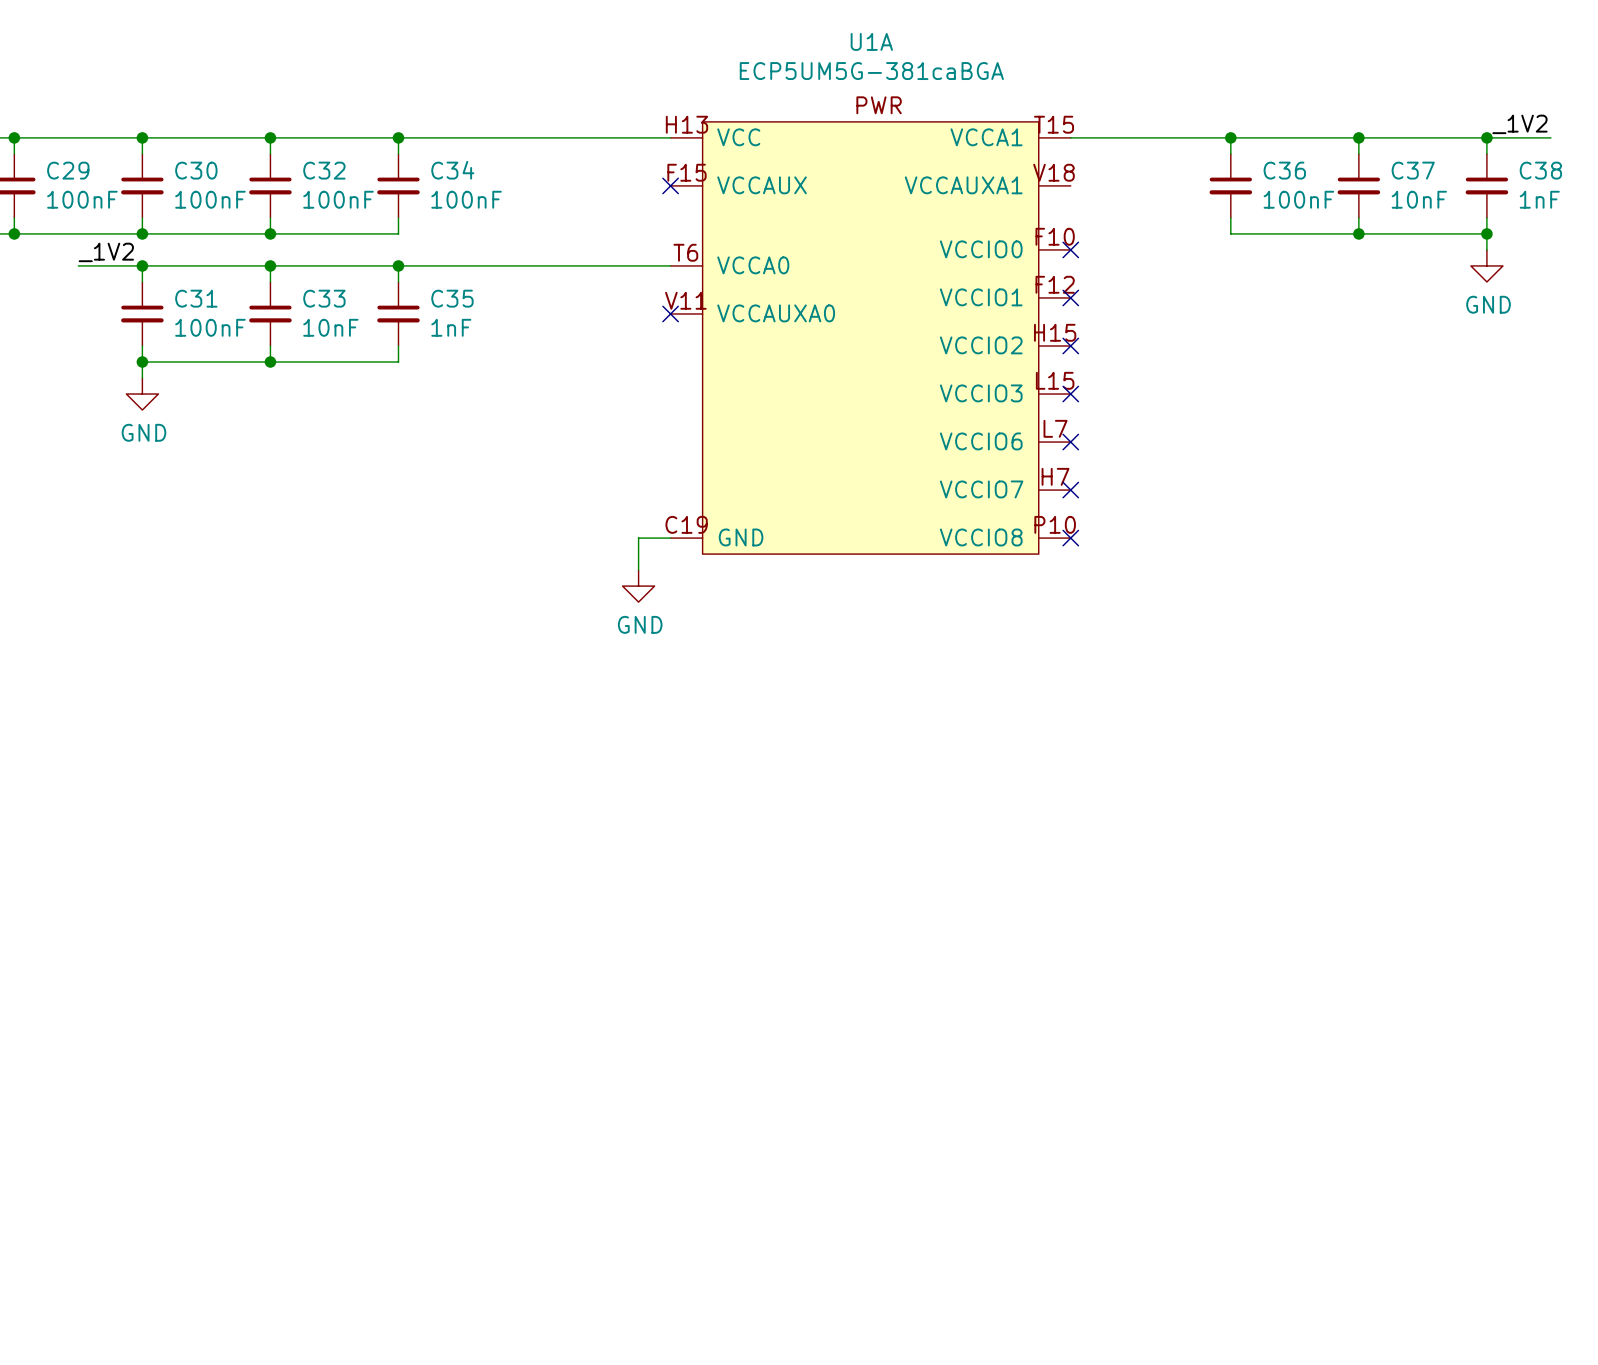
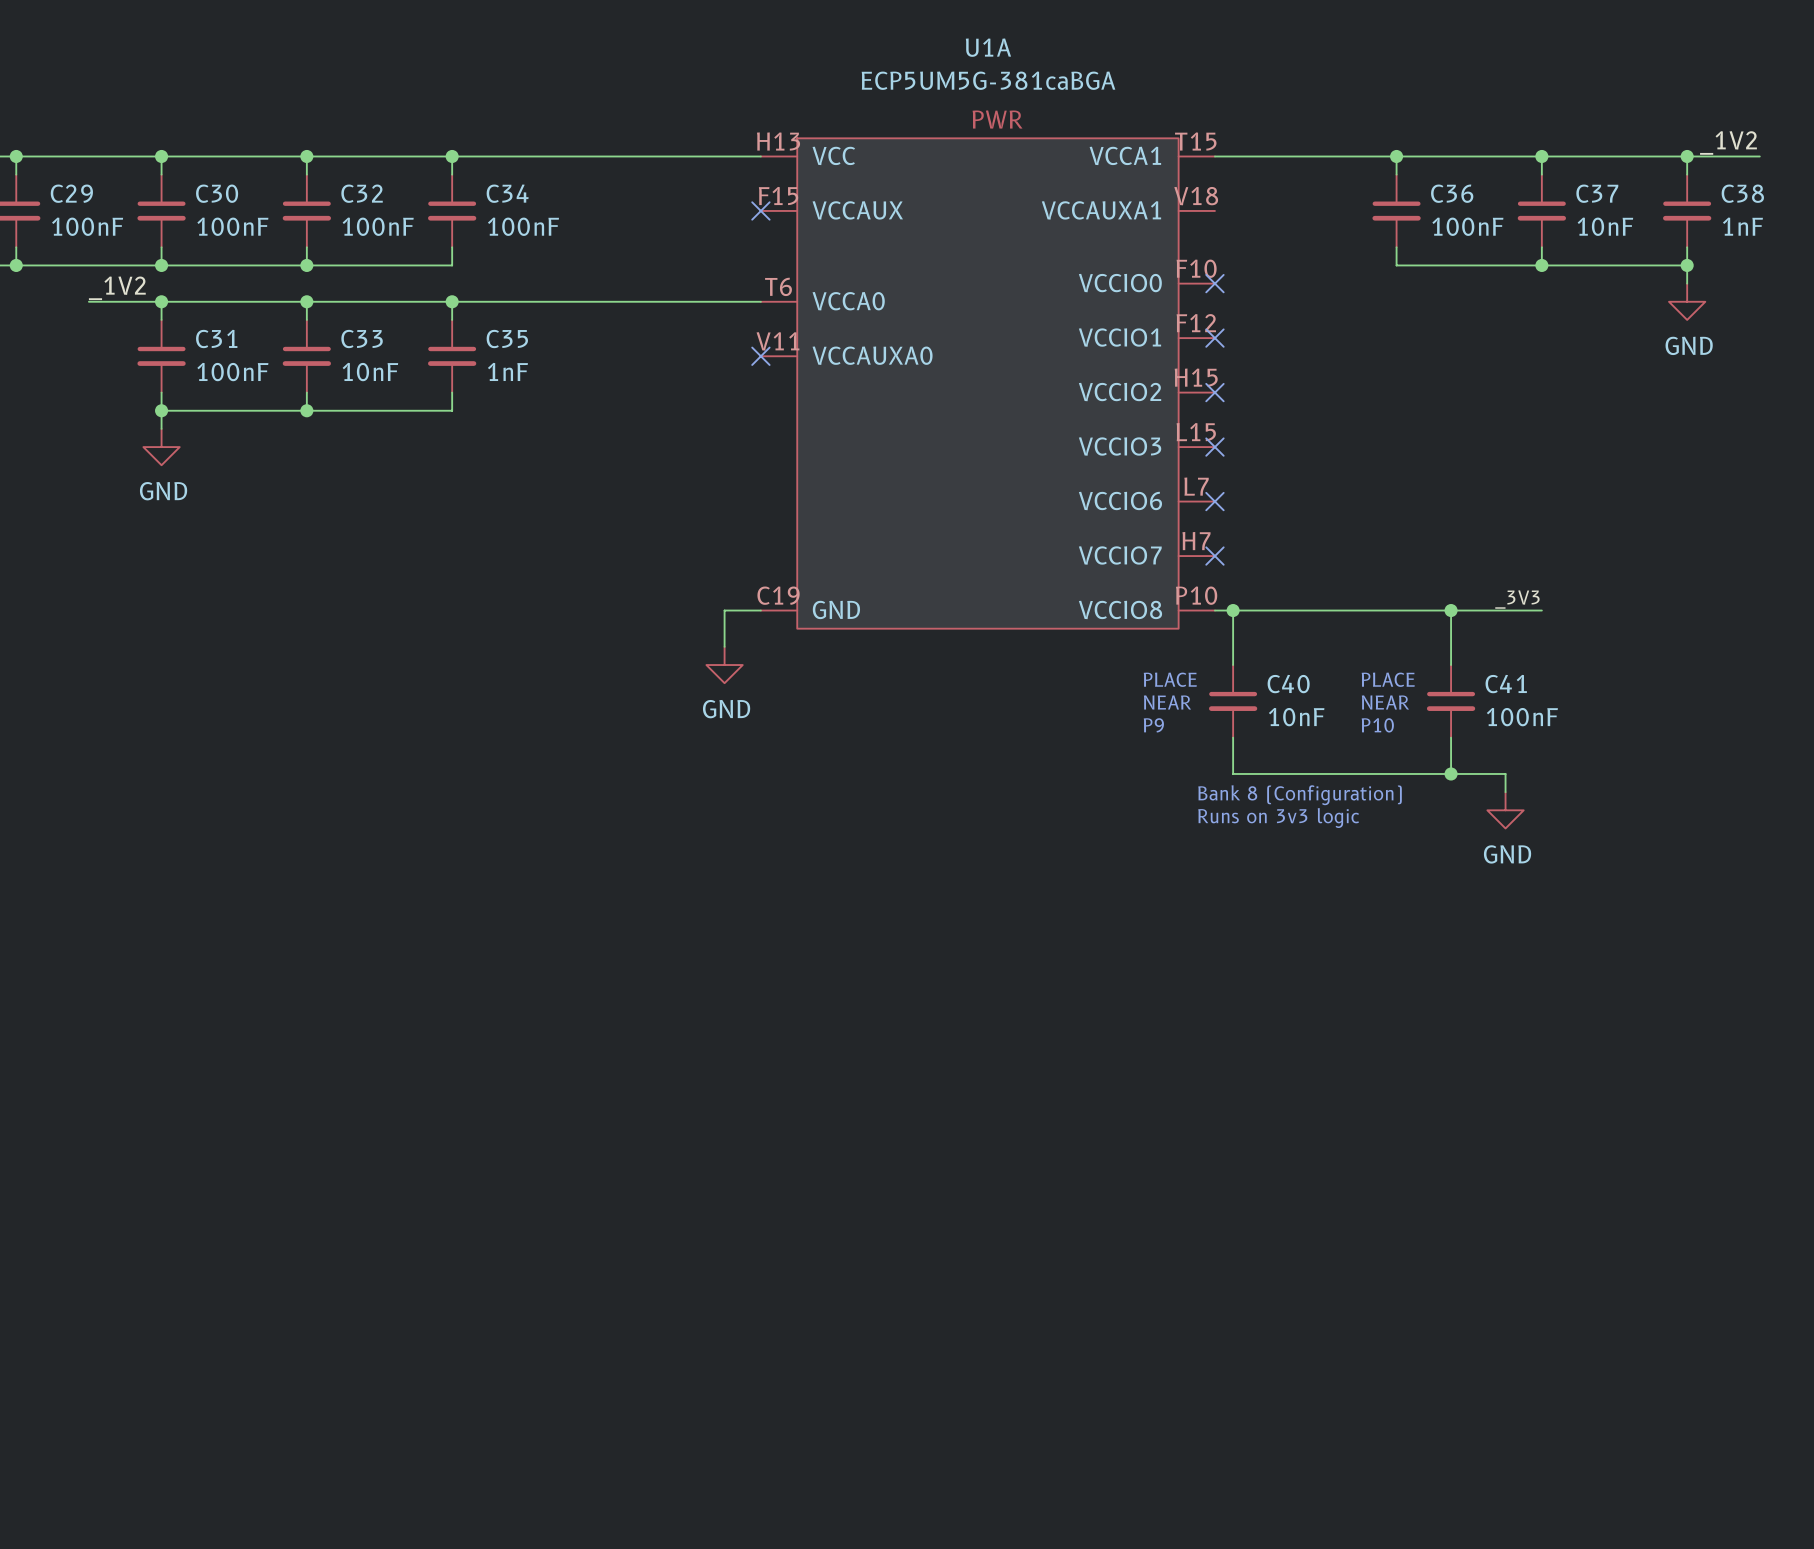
label: none -> _3V3 (1517, 599)
wire: none -> (1214, 610) (1541, 610)
no-connect mark: (1070, 538) -> none
wire: none -> (1233, 610) (1233, 665)
junction: none -> (1233, 610)
wire: none -> (1451, 610) (1451, 665)
junction: none -> (1451, 610)
text: none -> PLACE (1170, 679)
text: none -> PLACE (1388, 679)
C40: none -> 10nF (1233, 701)
C41: none -> 100nF (1451, 701)
text: none -> NEAR (1167, 702)
text: none -> NEAR (1385, 702)
text: none -> P9 (1153, 725)
text: none -> P10 (1377, 725)
wire: none -> (1233, 737) (1233, 773) (1505, 773) (1505, 792)
wire: none -> (1451, 737) (1451, 773)
junction: none -> (1451, 773)
text: none -> Bank 8 (Configuration) (1300, 795)
power symbol: none -> GND (1505, 810)
text: none -> Runs on 3v3 logic (1278, 818)

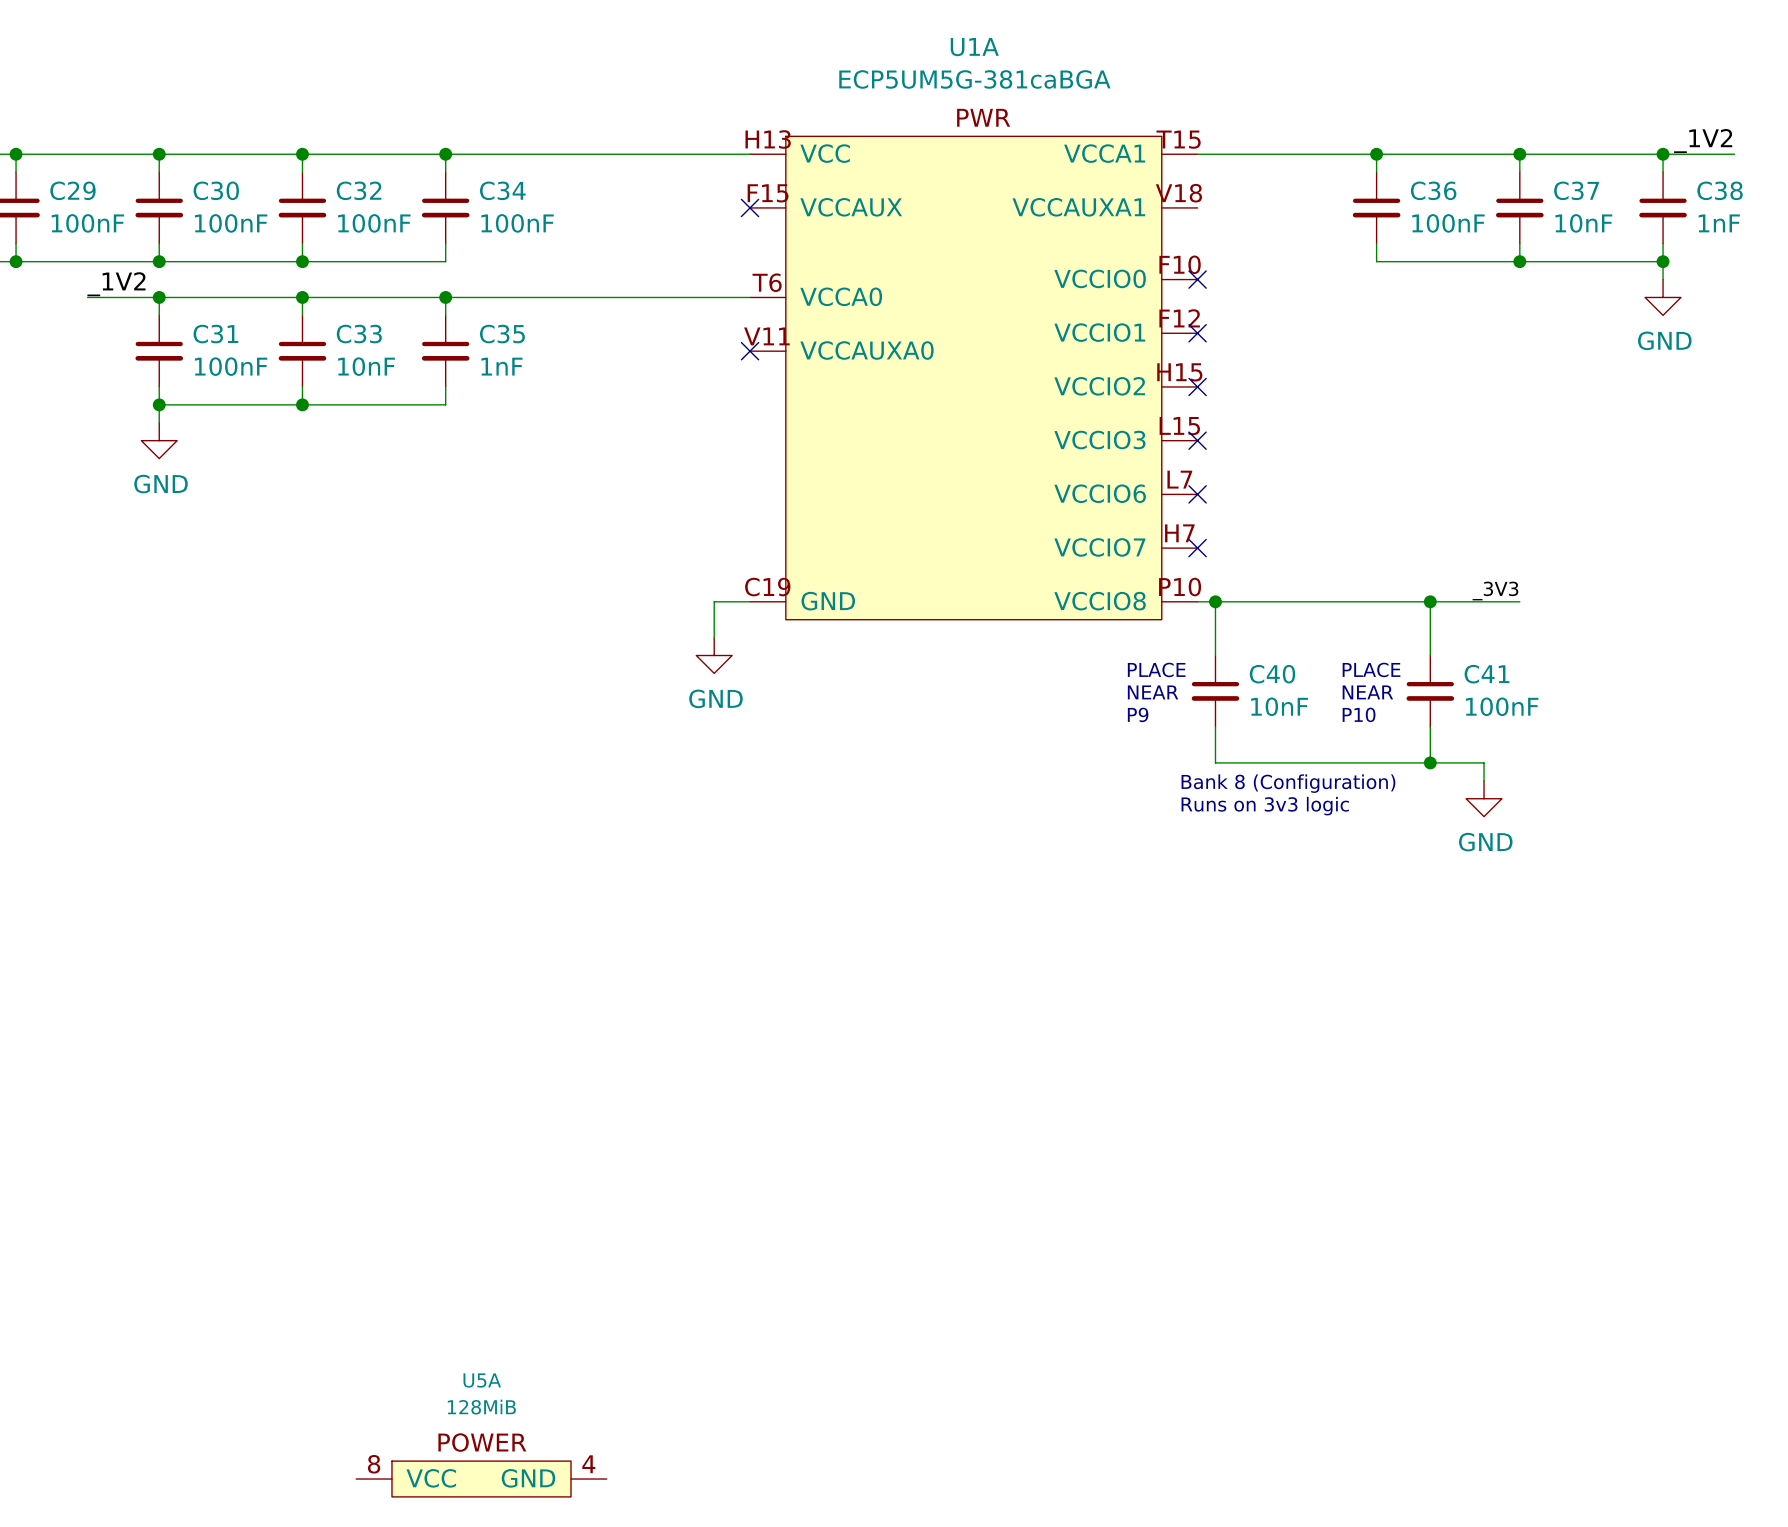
U5A: none -> 128MiB (481, 1479)

